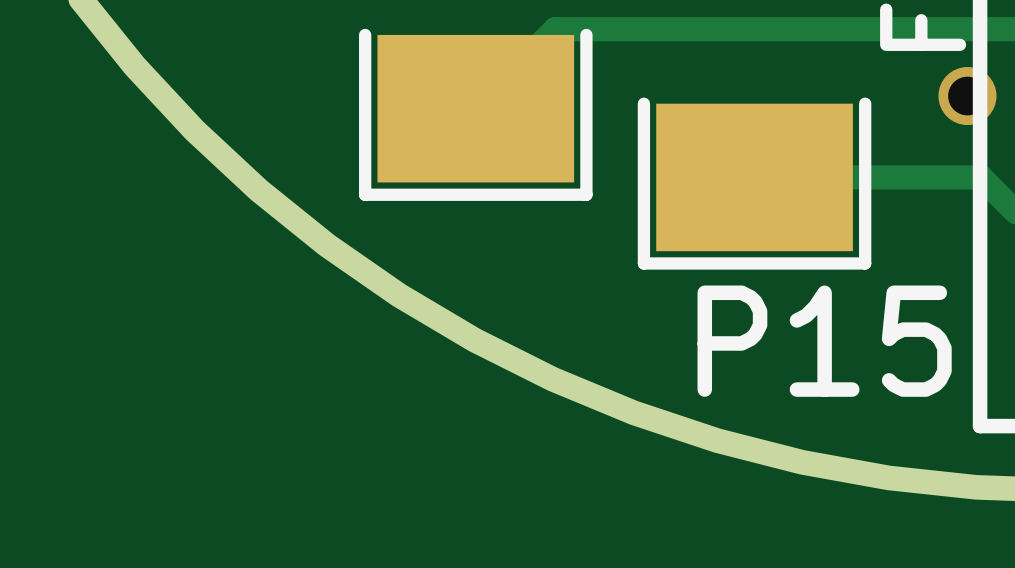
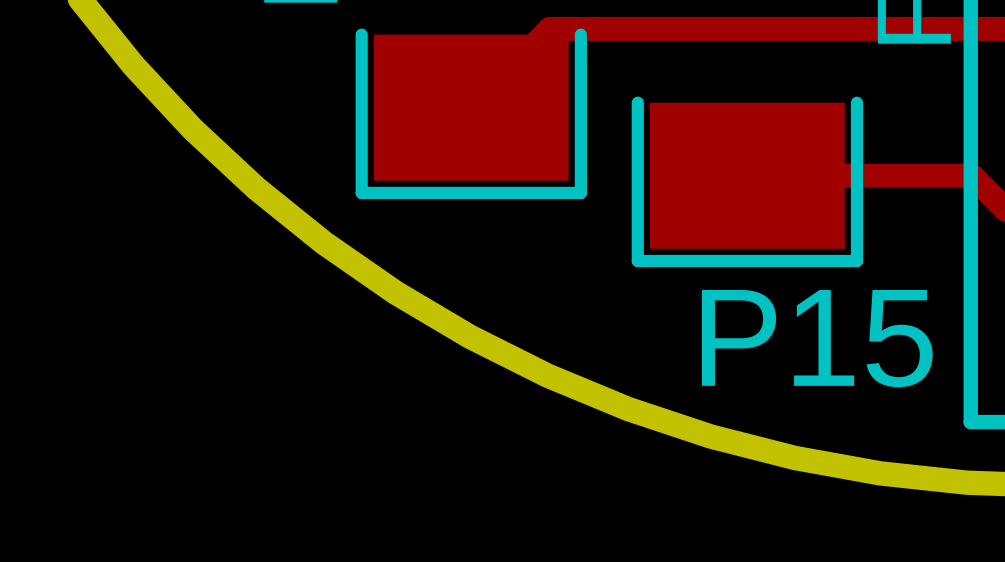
via: (967, 96) -> none

